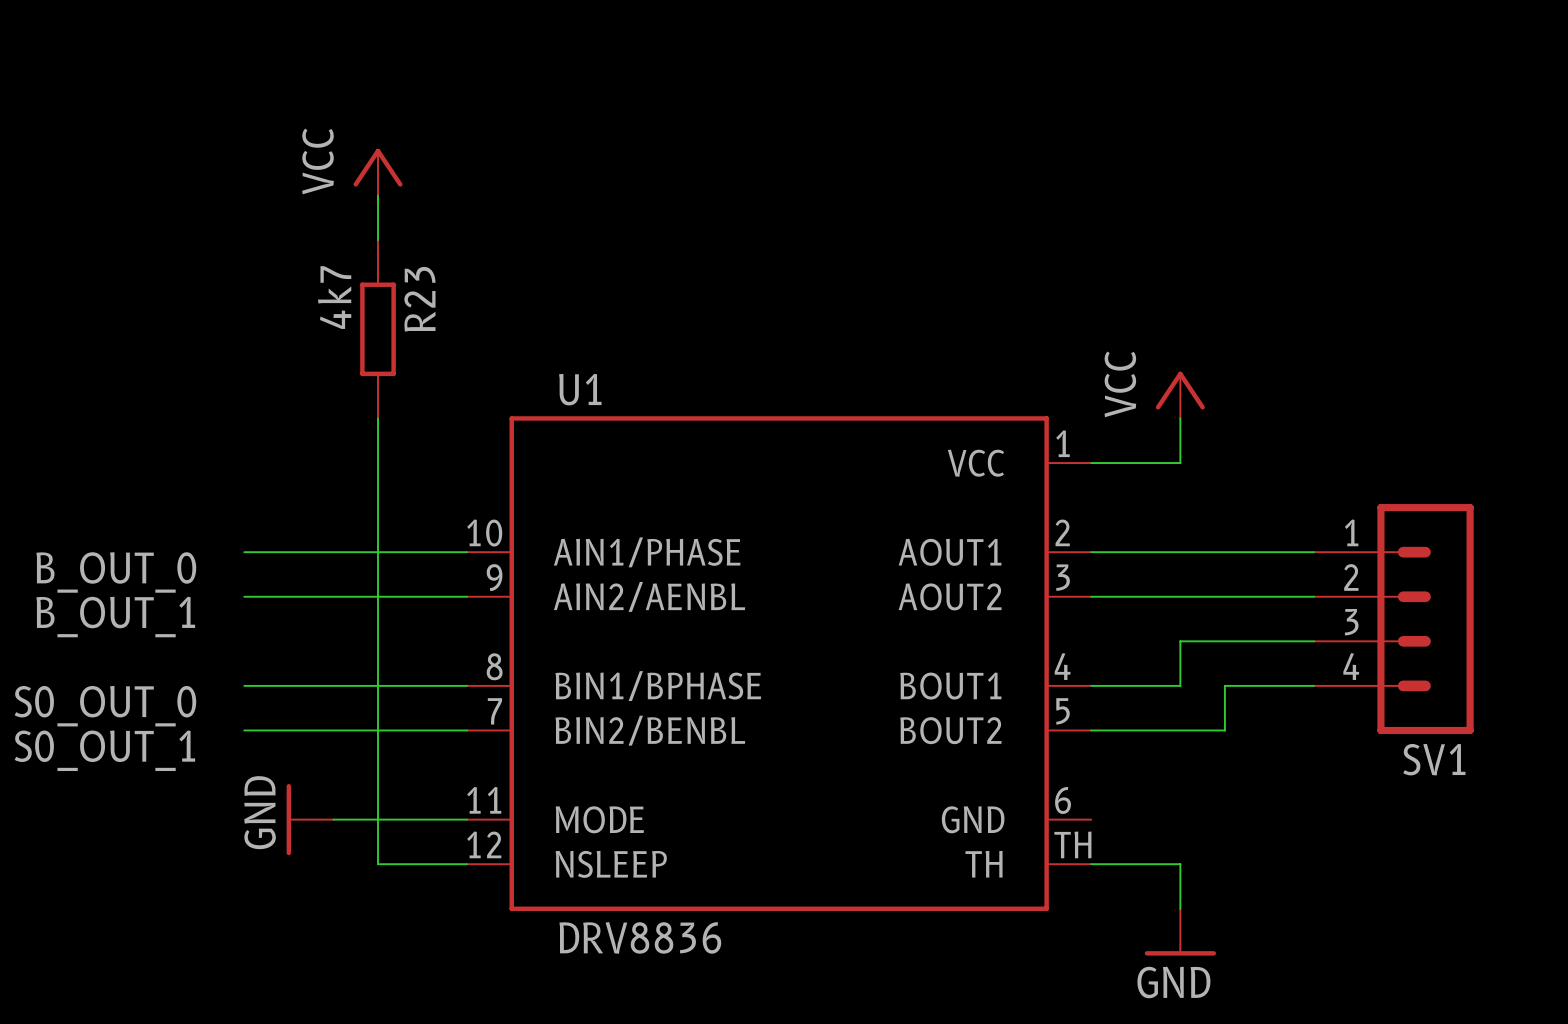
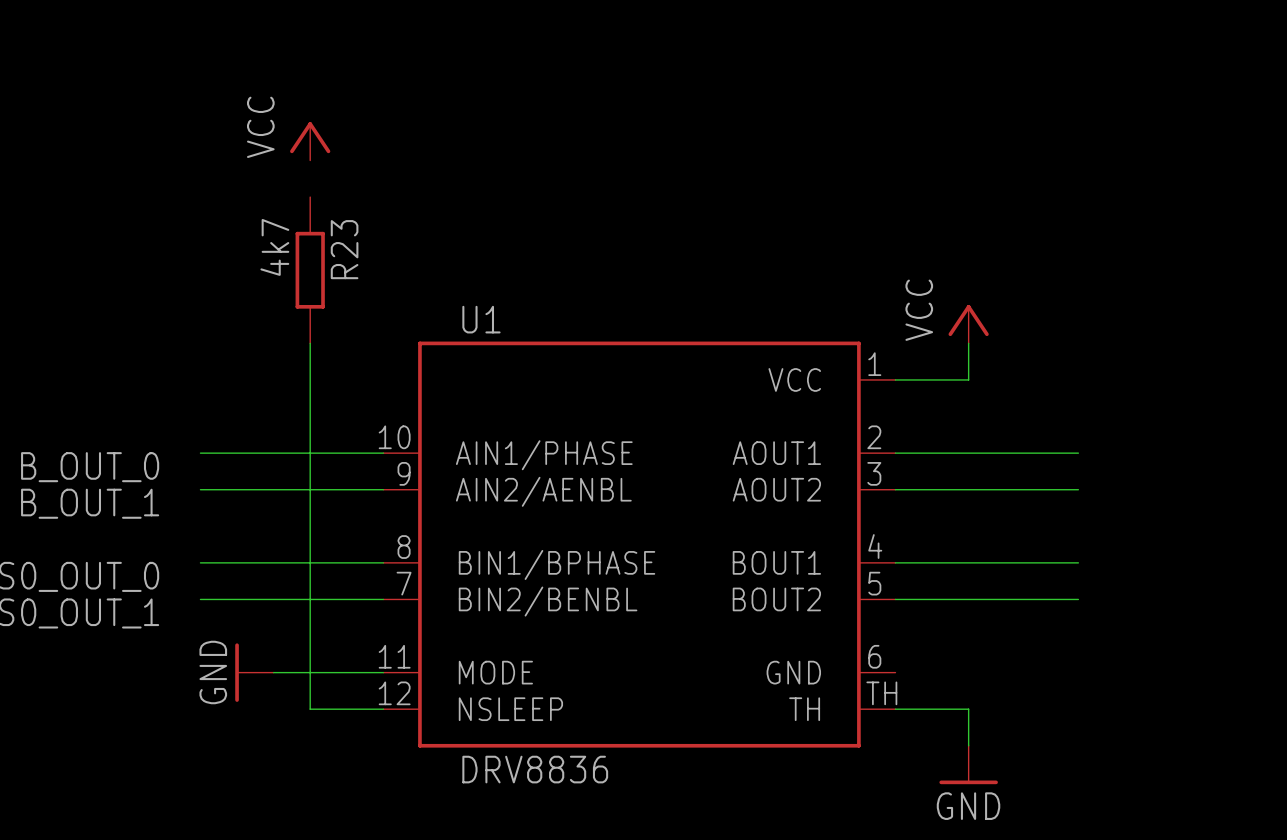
wire: (378, 195) (378, 240) -> none
SV1: (1393, 619) -> none
wire: (1314, 641) (1180, 641) (1180, 685) -> none
wire: (1224, 685) (1224, 730) -> (1005, 562) (968, 562)
wire: none -> (1005, 599) (1078, 599)

